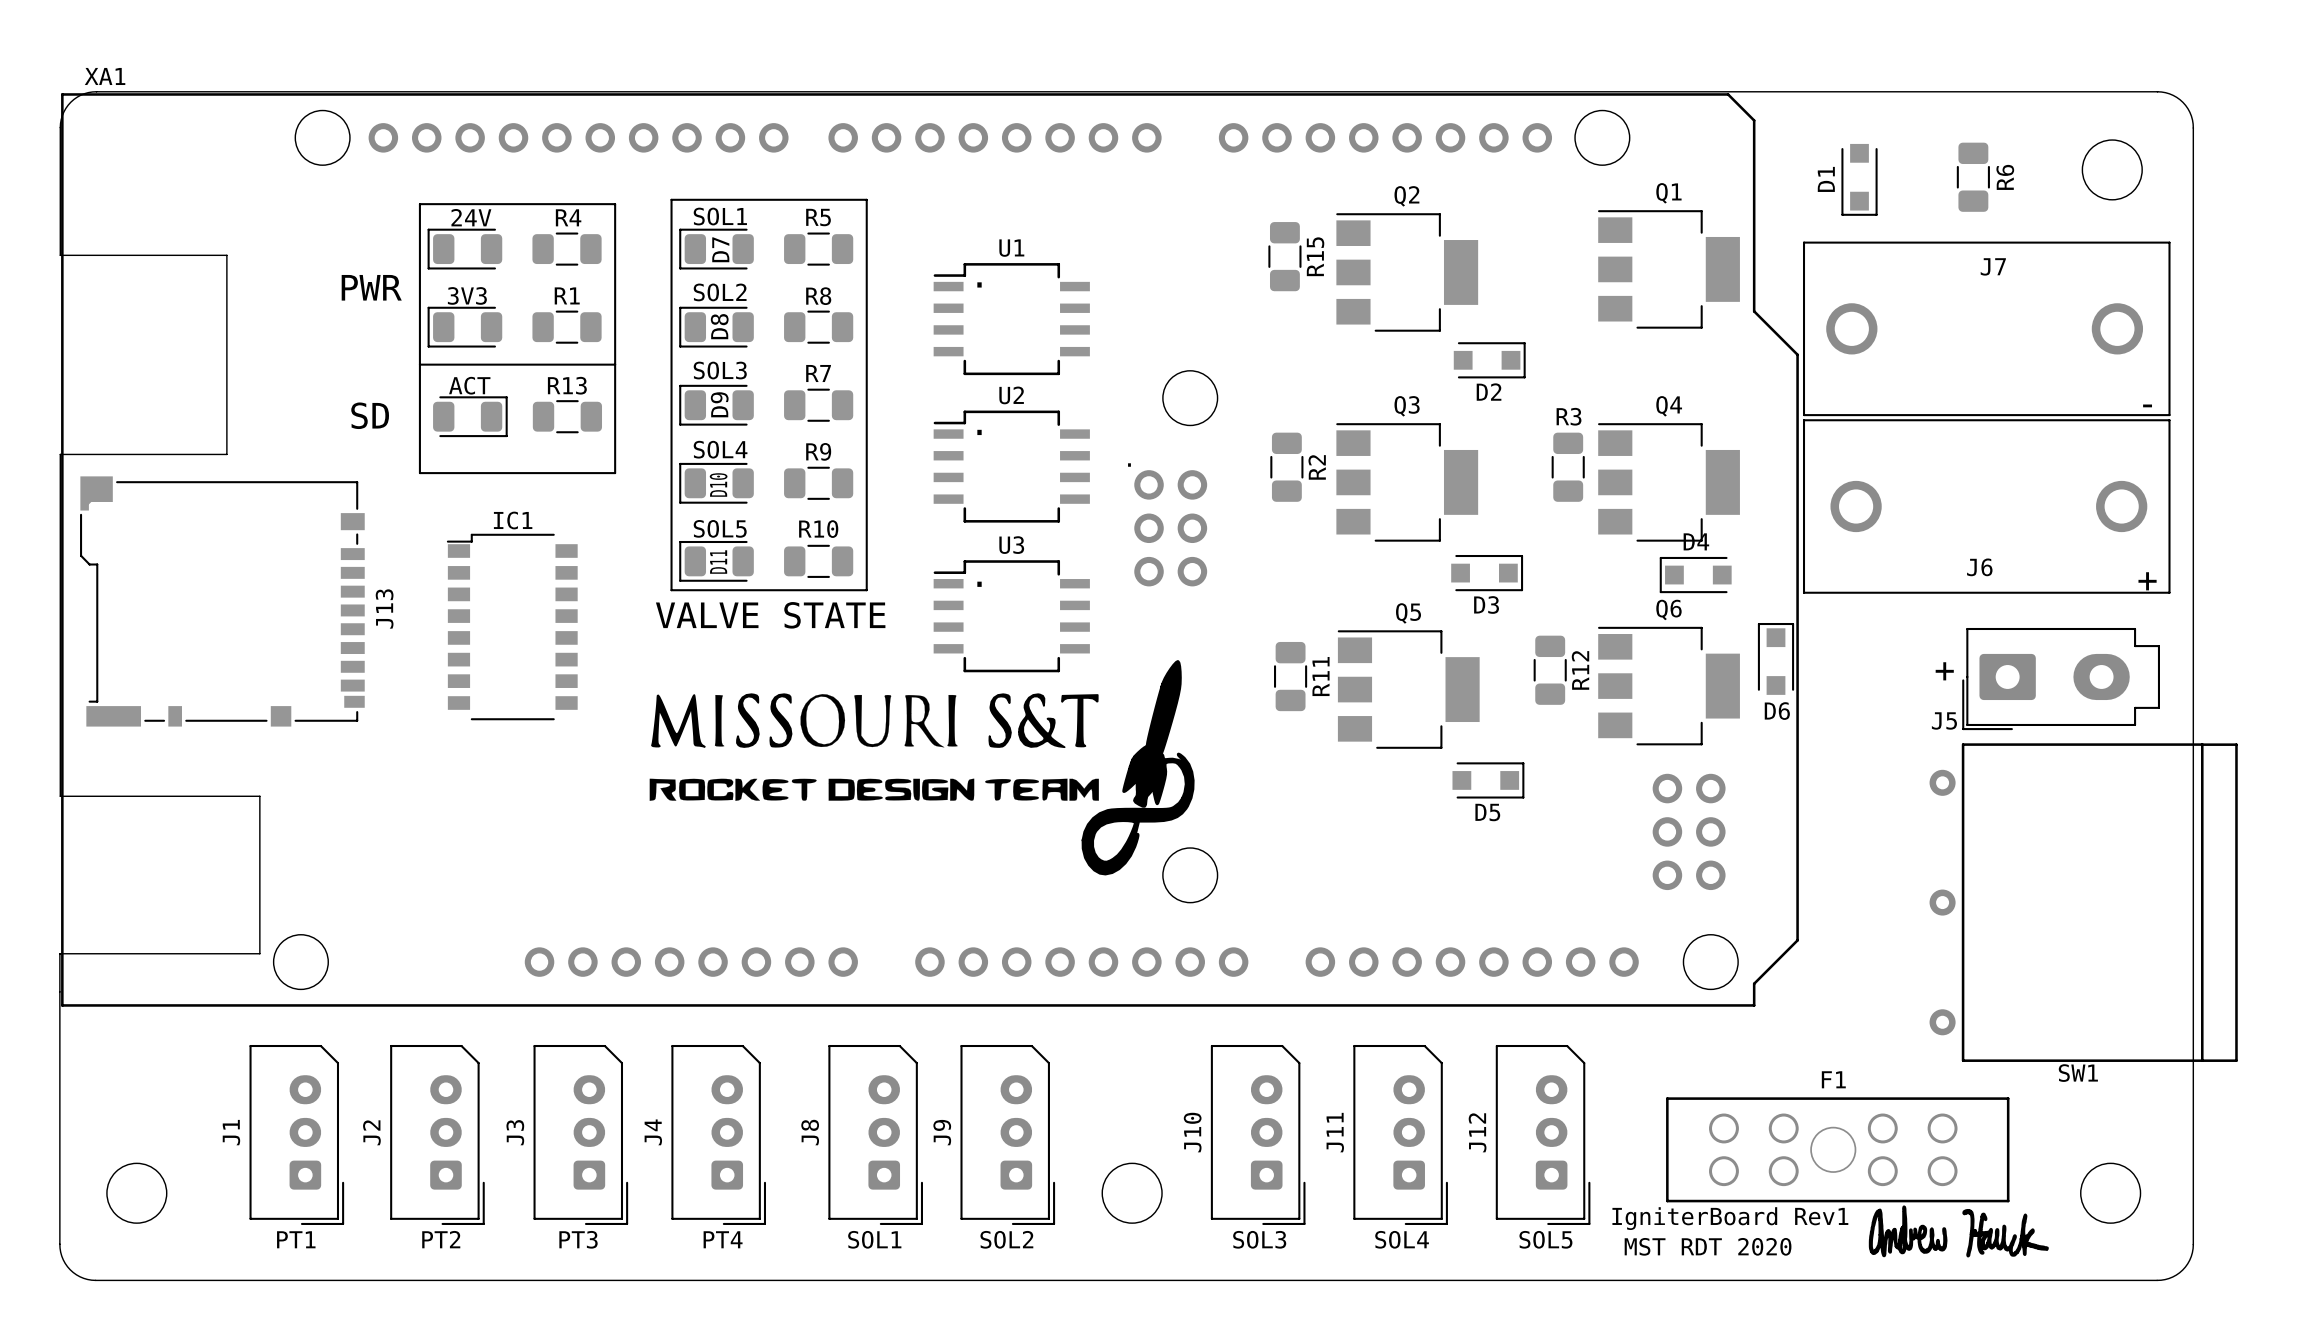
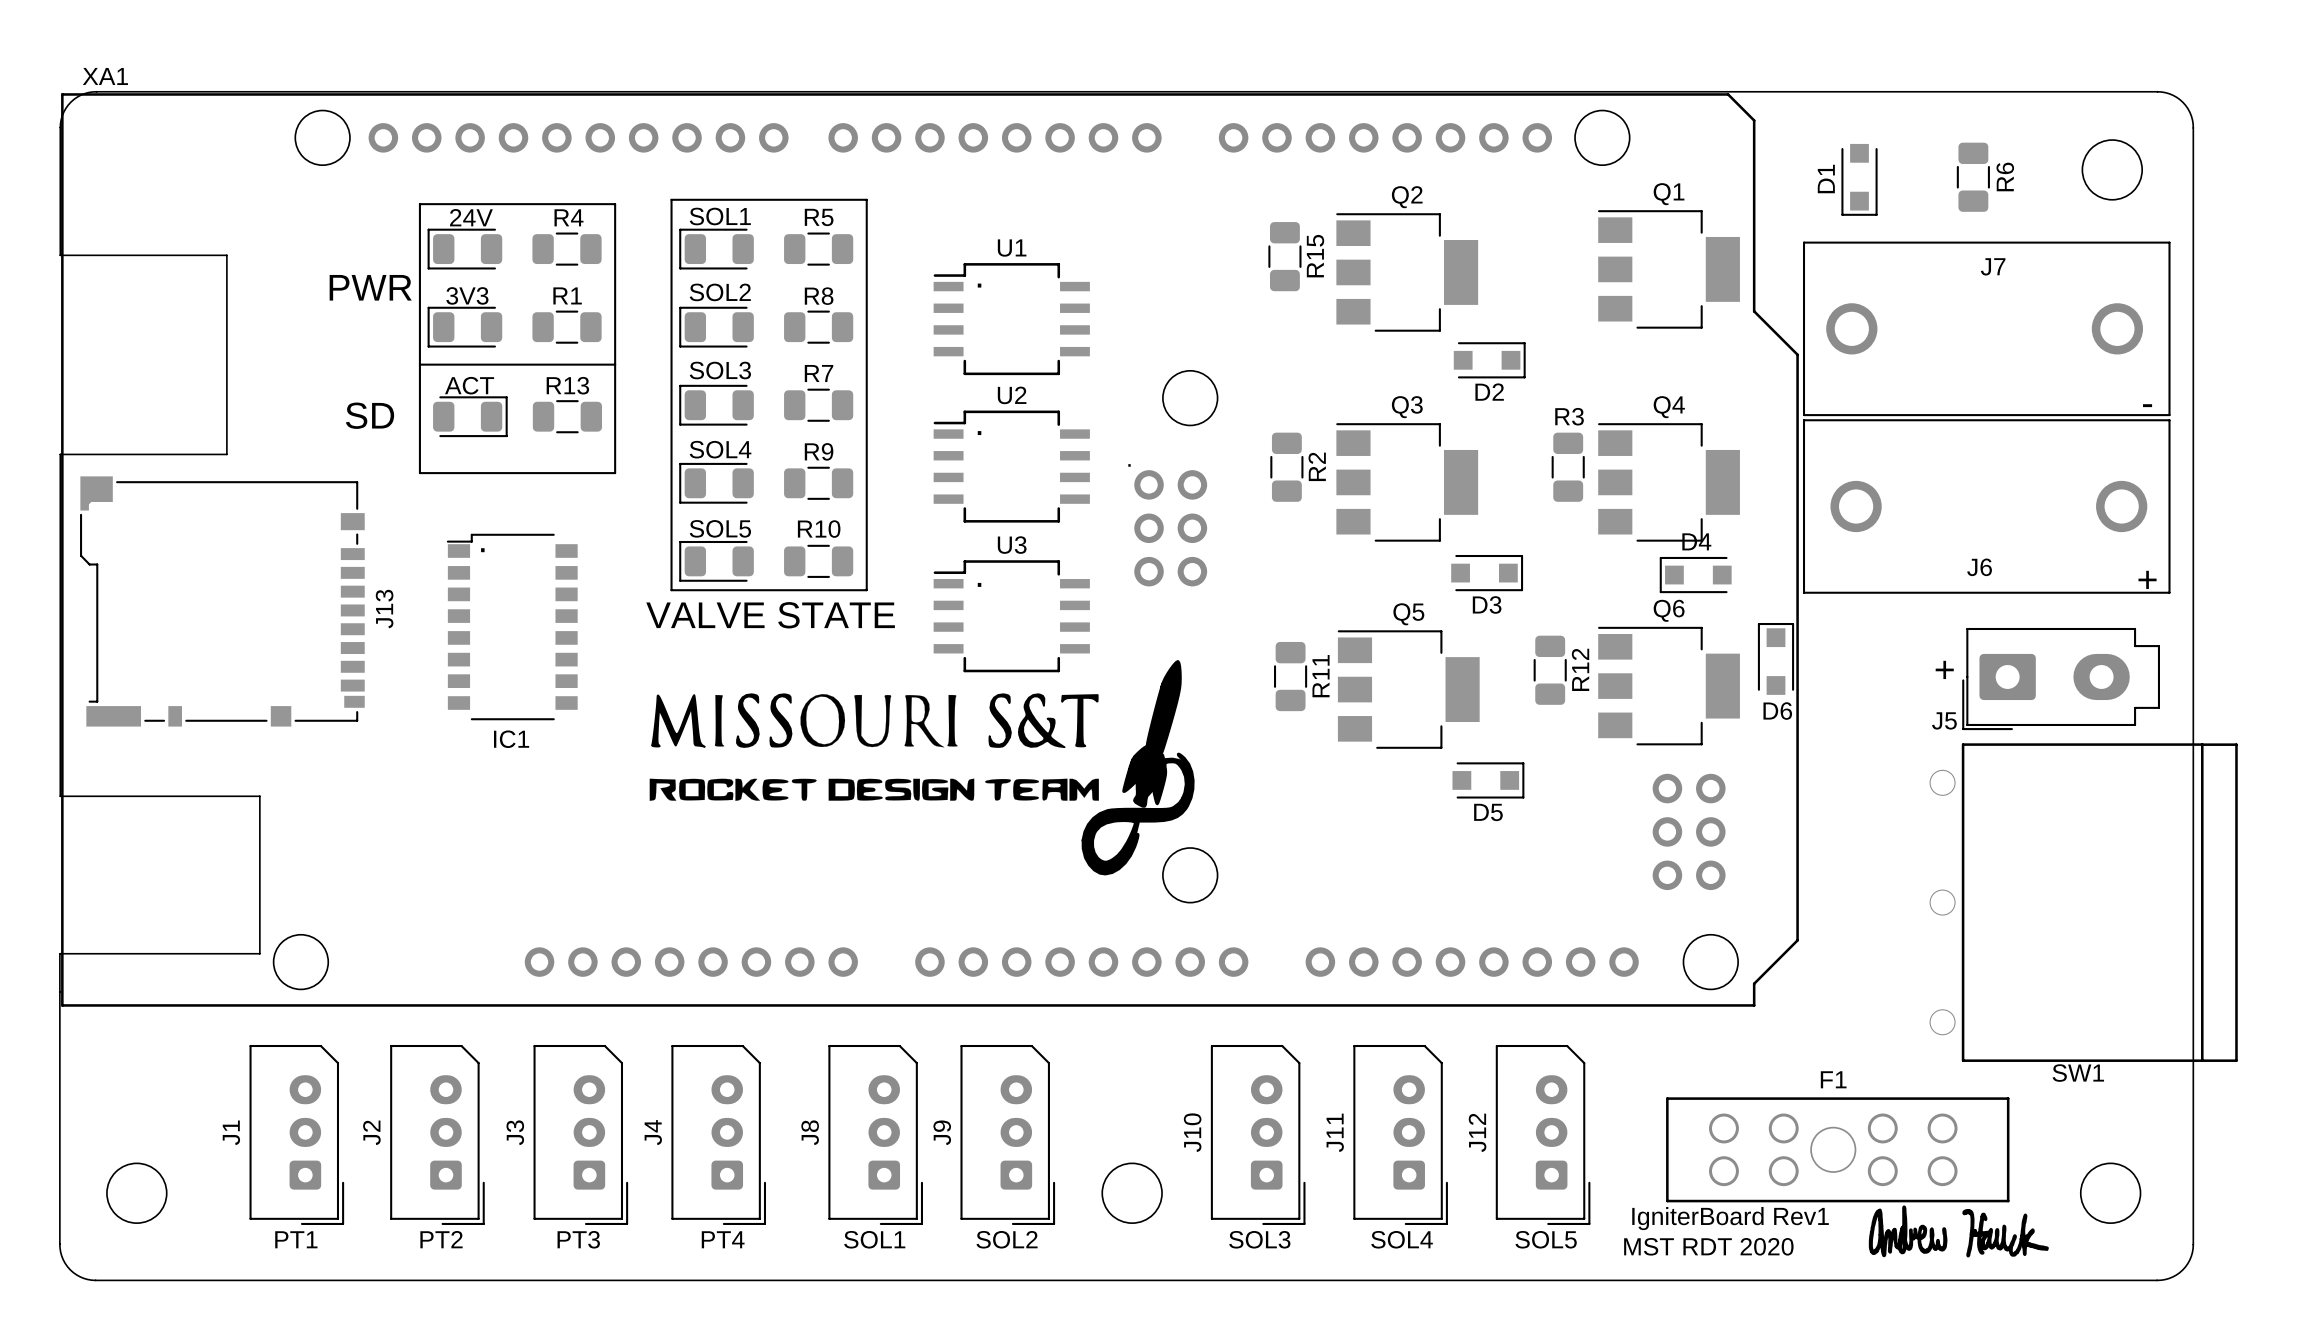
D7 name: D7 (720, 249) -> none
D8 name: D8 (719, 326) -> none
D9 name: D9 (719, 404) -> none
D10 name: D10 (718, 485) -> none
IC1 name position: IC1 (513, 520) -> IC1 (511, 739)
text: none -> . (482, 550)
D11 name: D11 (718, 562) -> none
SW1 footprint: [1929, 743, 2238, 1062] -> [1929, 743, 2238, 1062]

